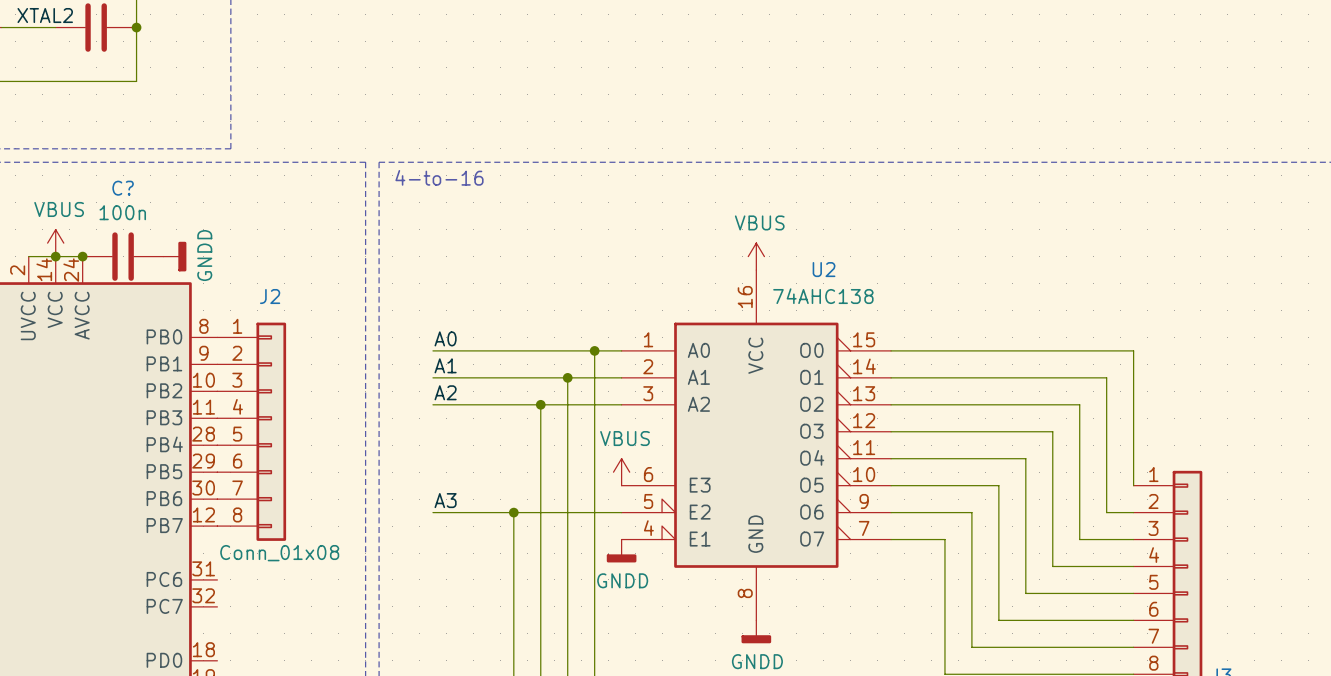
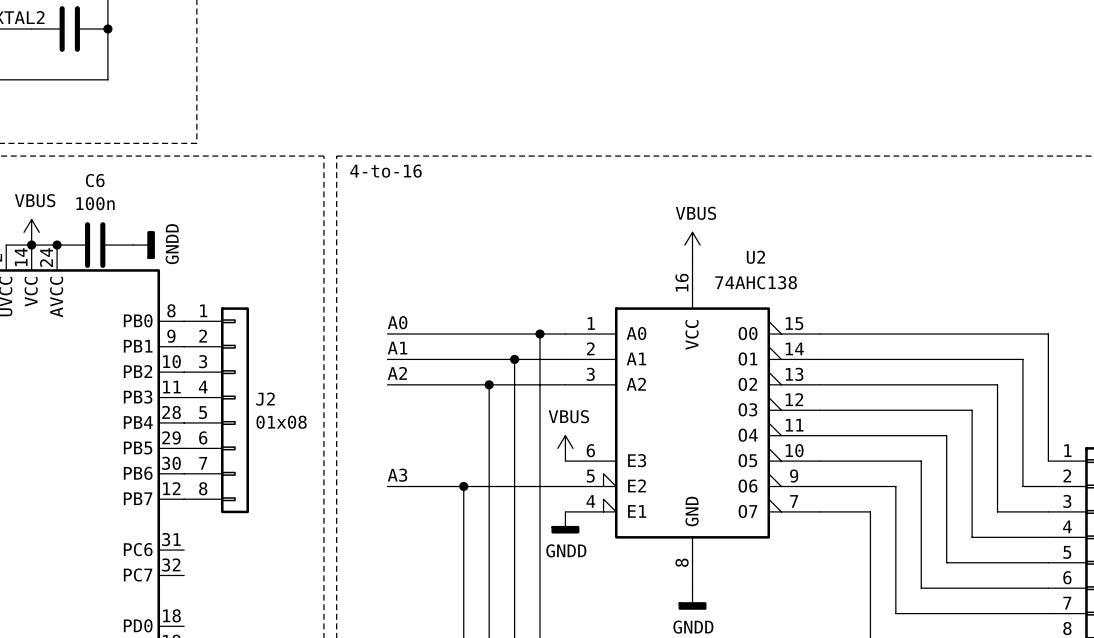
C? name: C? (123, 188) -> C6 (95, 180)
J2 name position: J2 (270, 296) -> J2 (265, 399)
J2 value: Conn_01x08 (279, 553) -> 01x08 (281, 422)

